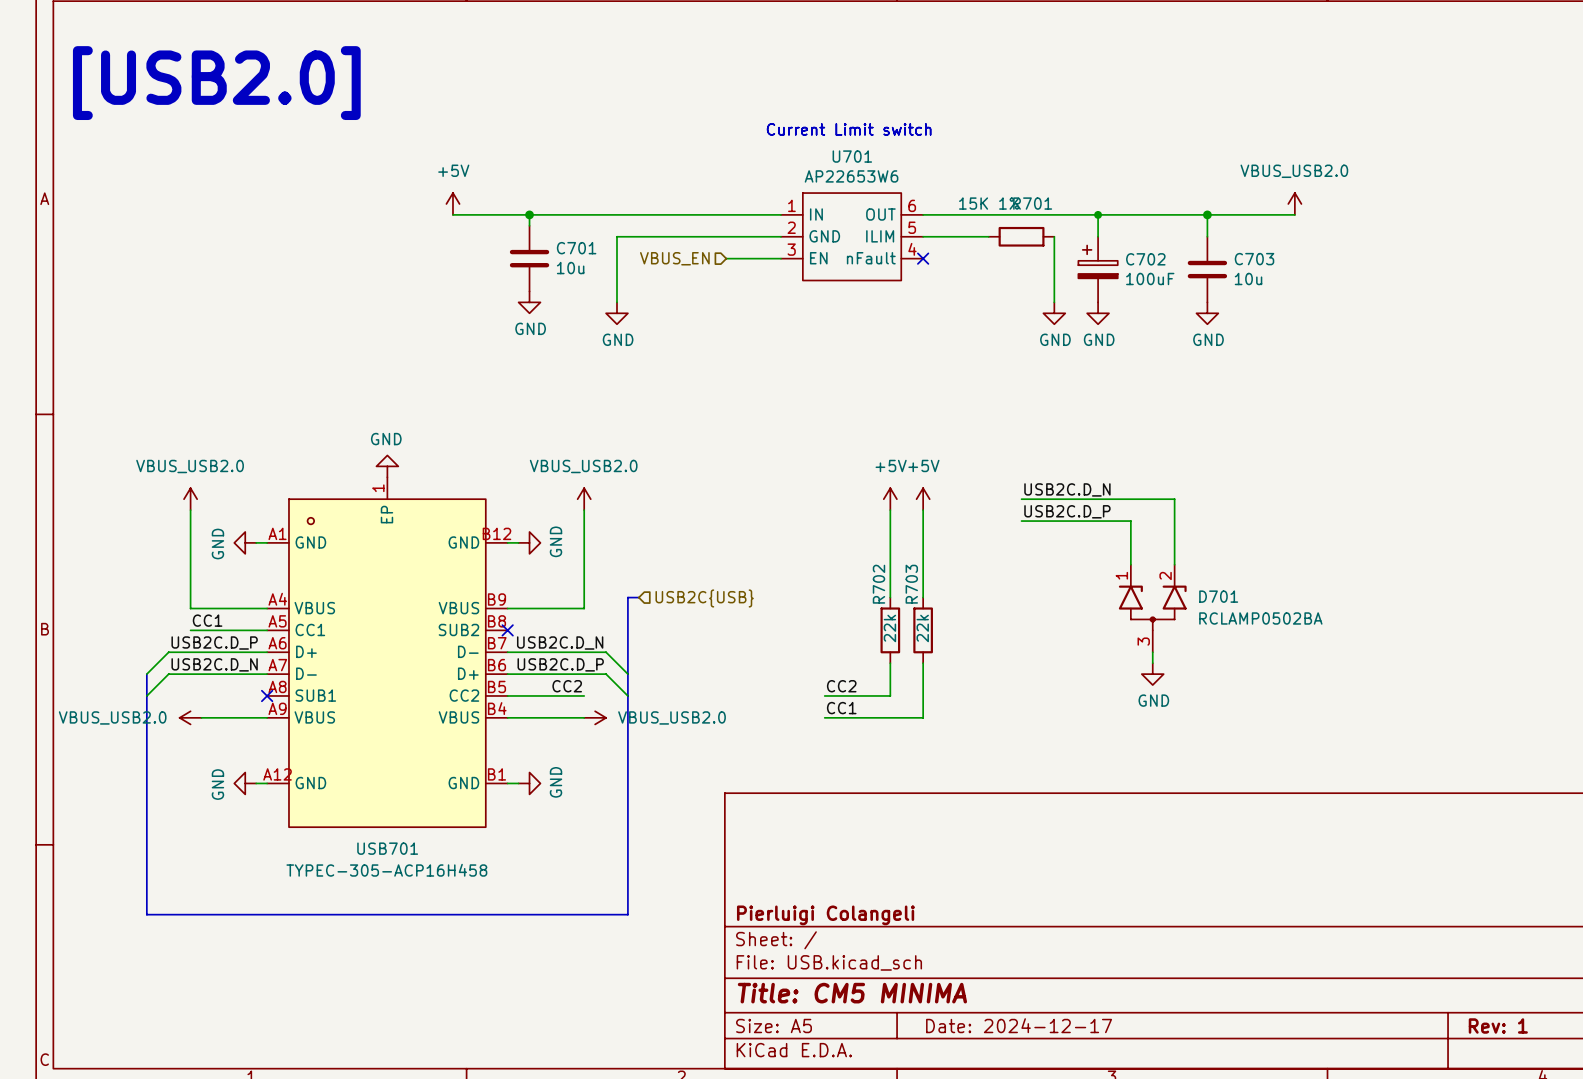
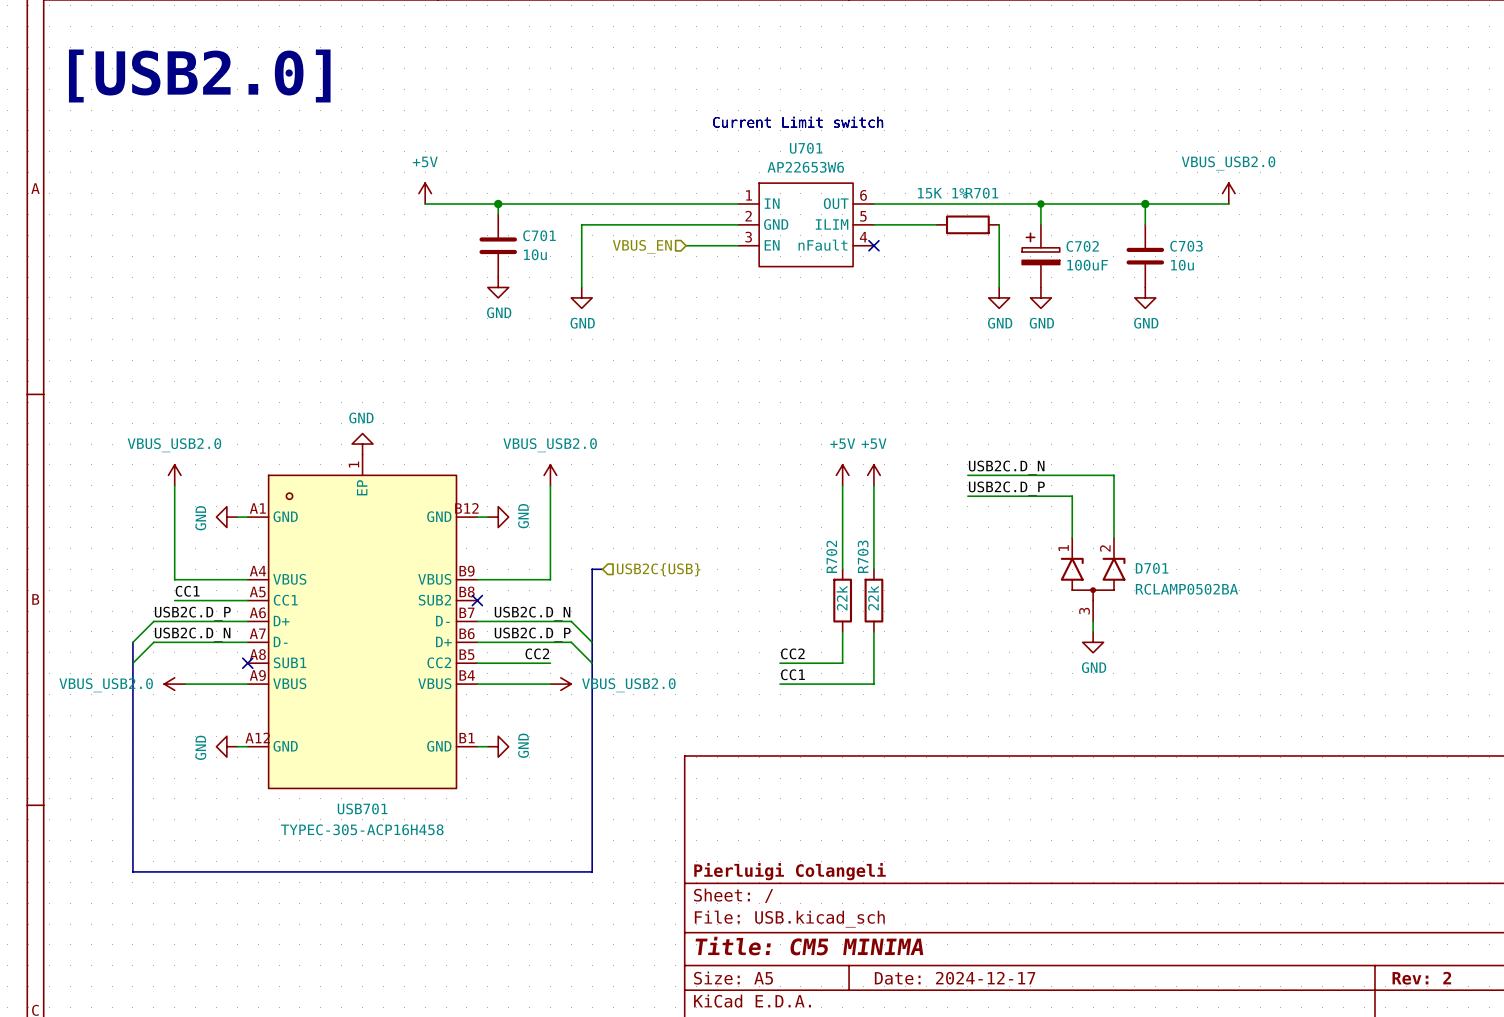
title block: Rev: 1 (1498, 1026) -> Rev: 2 (1421, 978)

